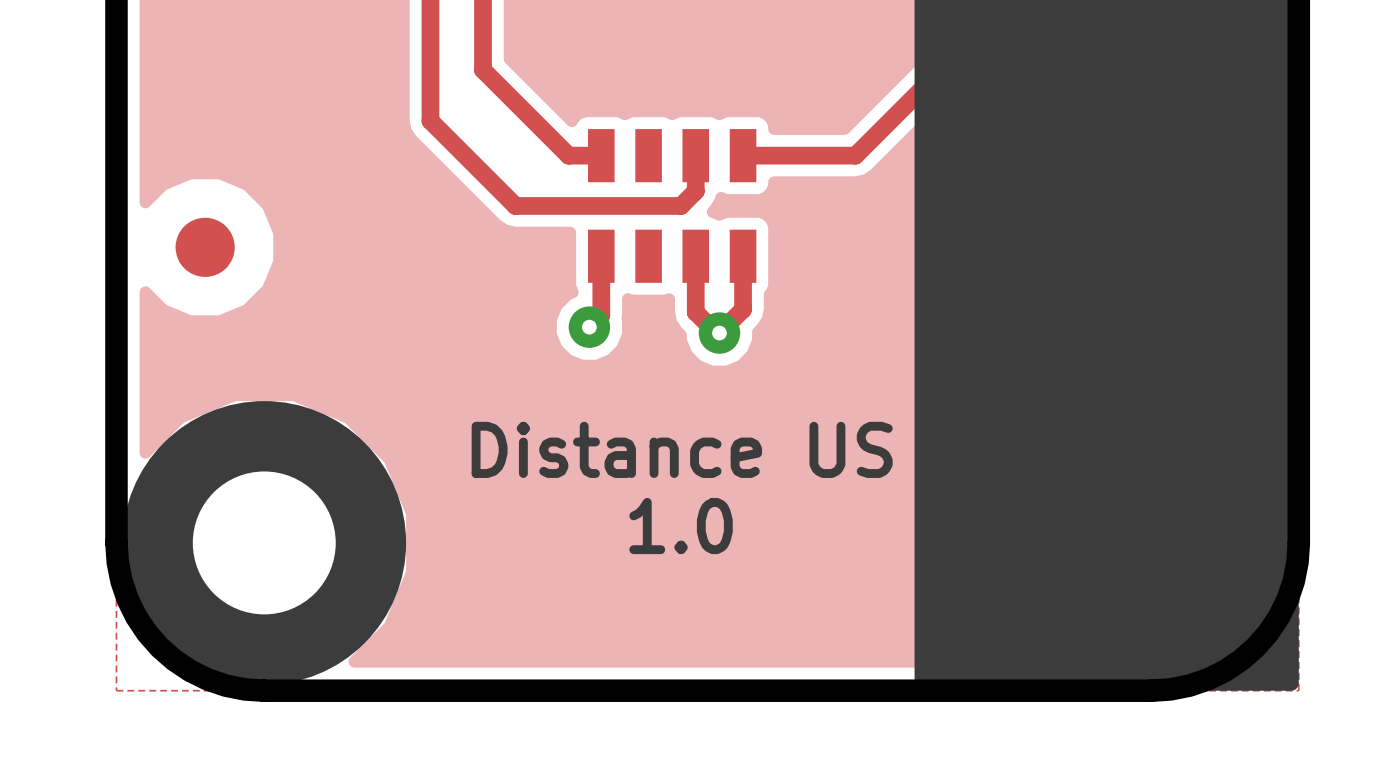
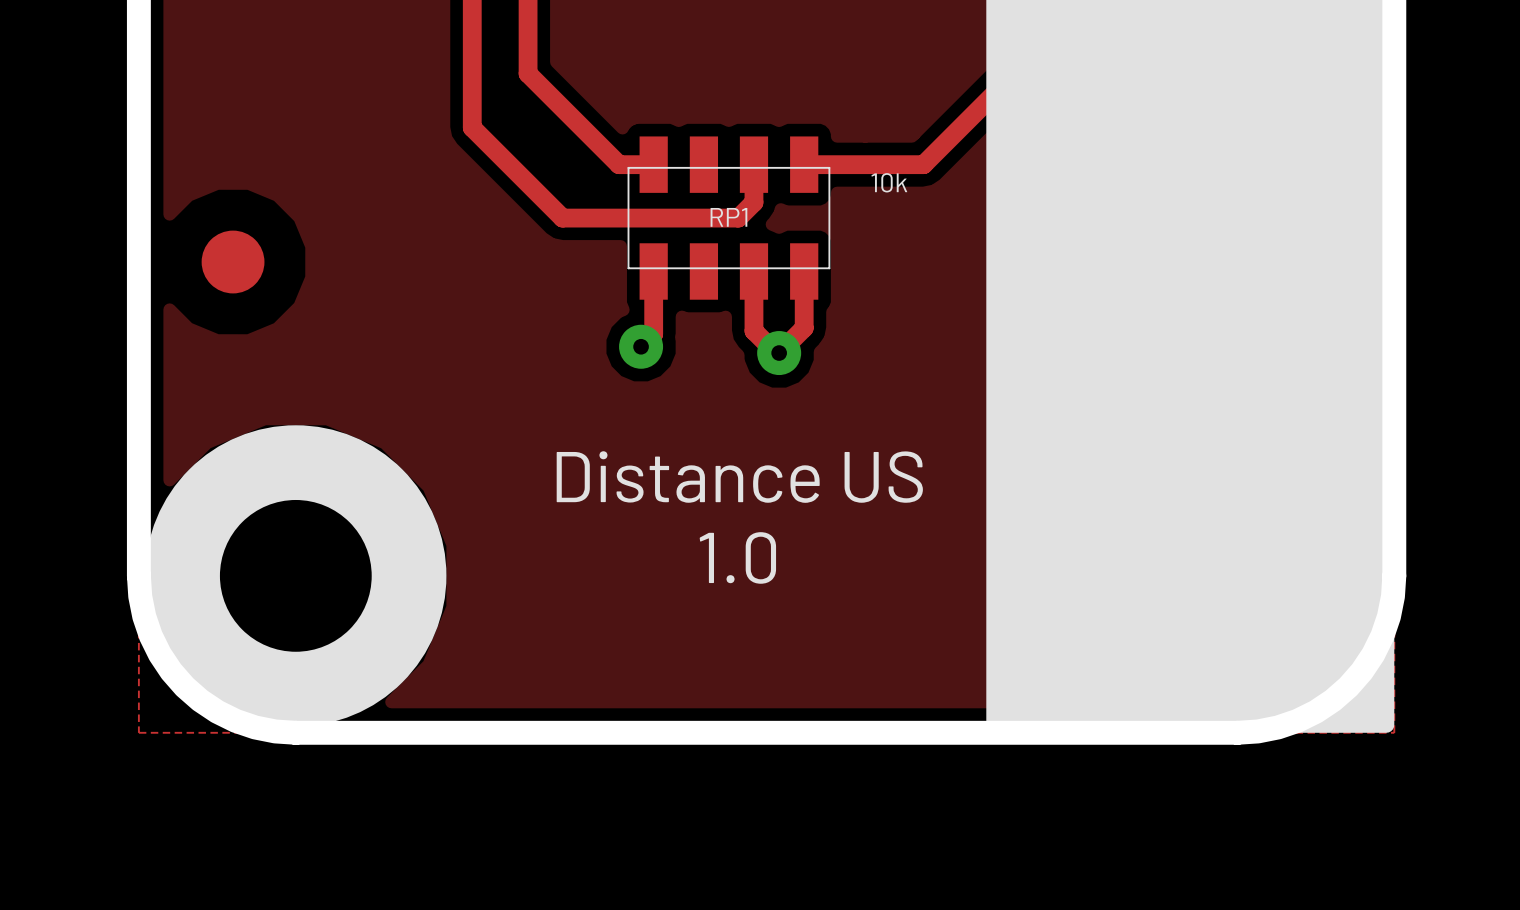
part: (672, 205) -> none
RP1: none -> 10k (728, 218)

